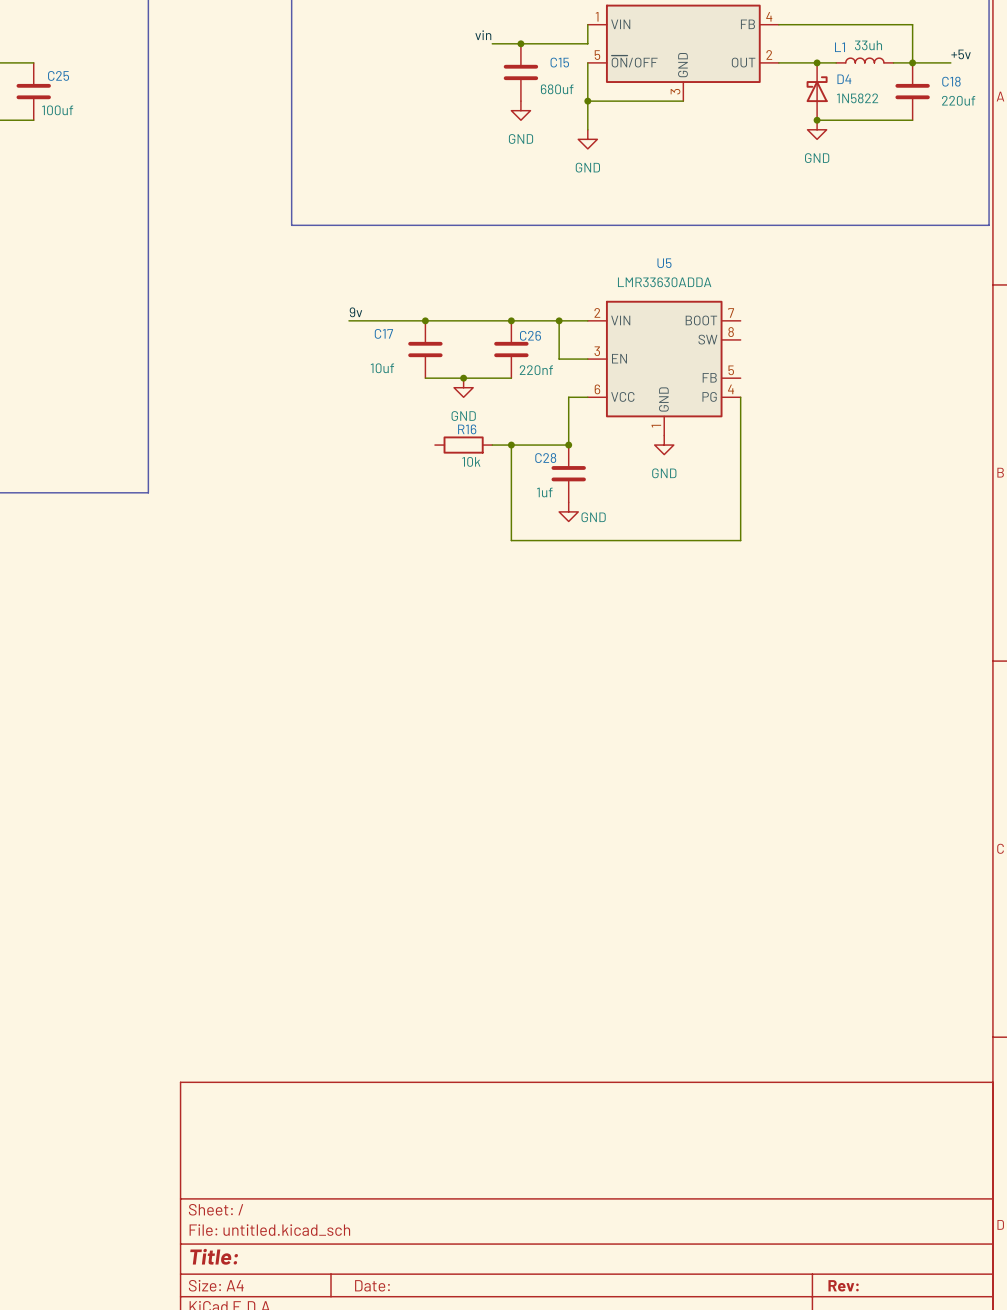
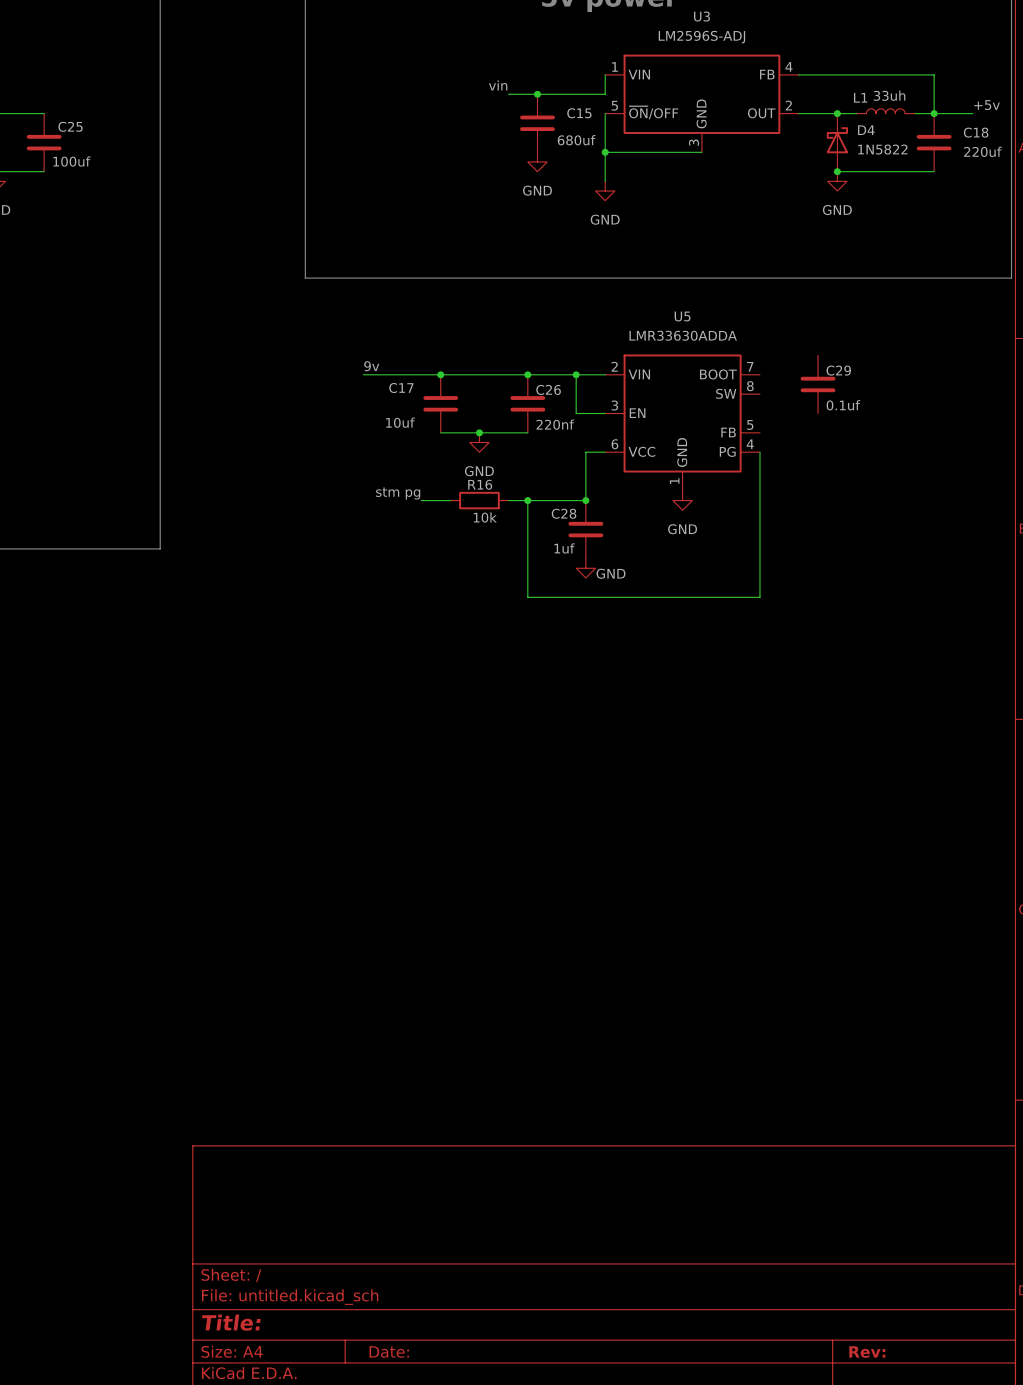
C29: none -> 0.1uf (818, 384)
label: none -> stm pg (398, 493)
wire: none -> (421, 500) (450, 500)

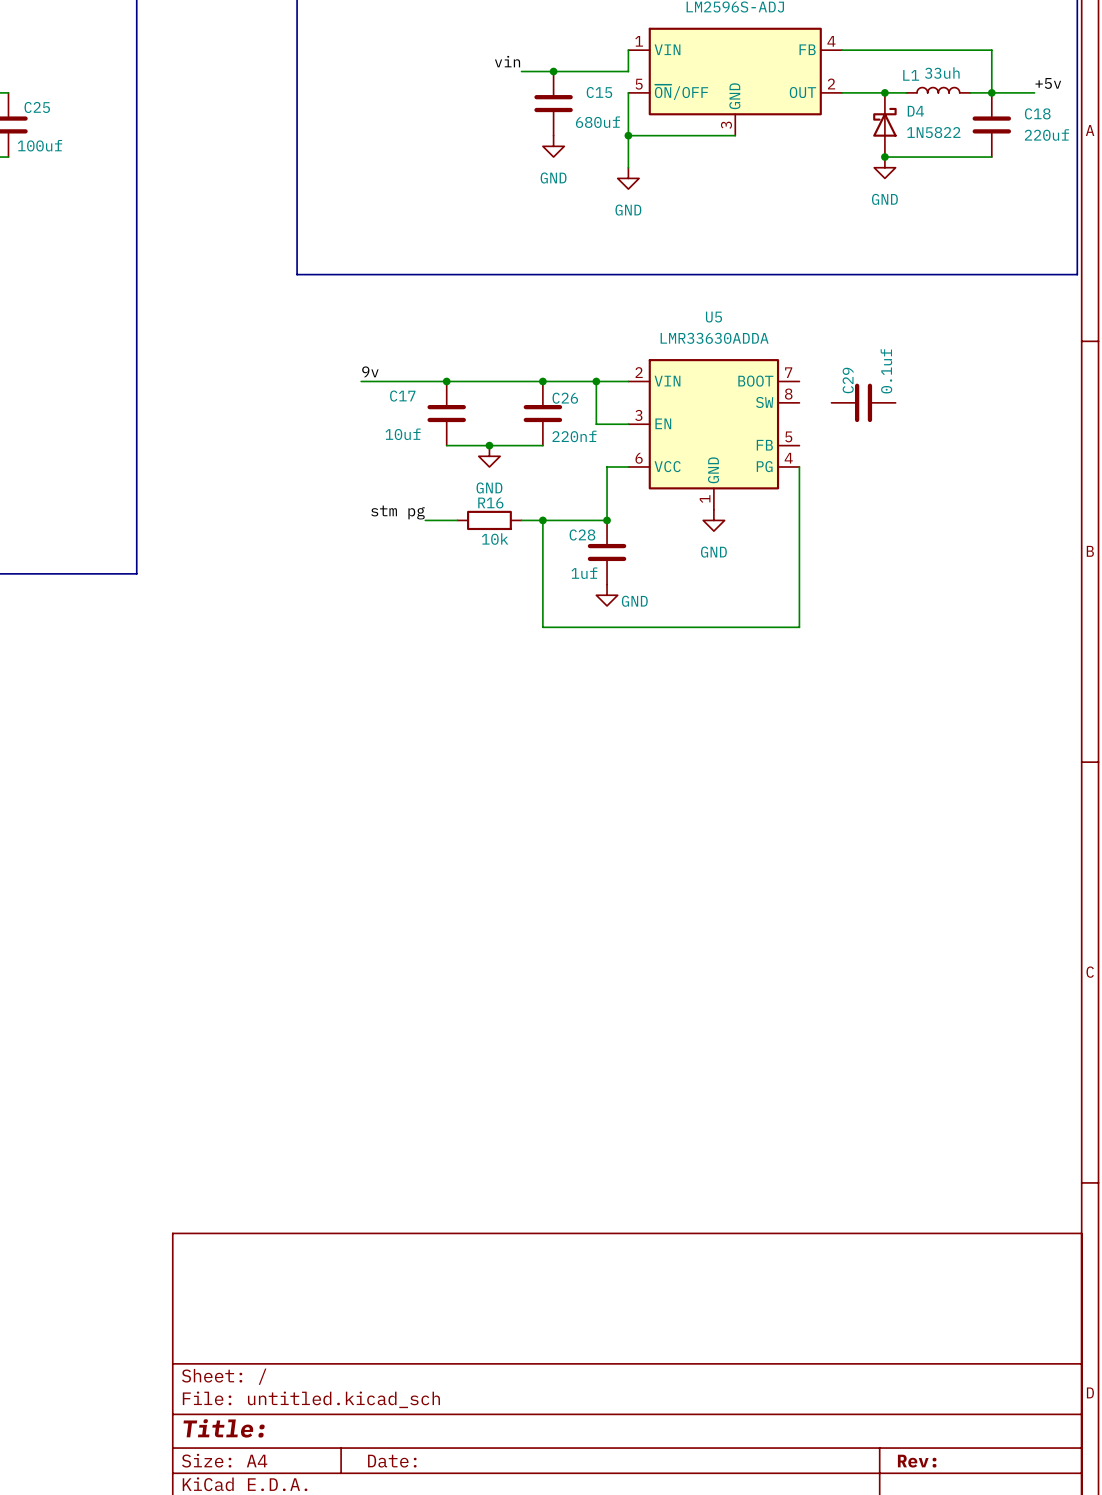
C29 name position: C29 (838, 370) -> C29 (848, 380)
C29 rotation: 0° (818, 384) -> 90° clockwise (863, 402)
C29 value position: 0.1uf (843, 405) -> 0.1uf (886, 371)

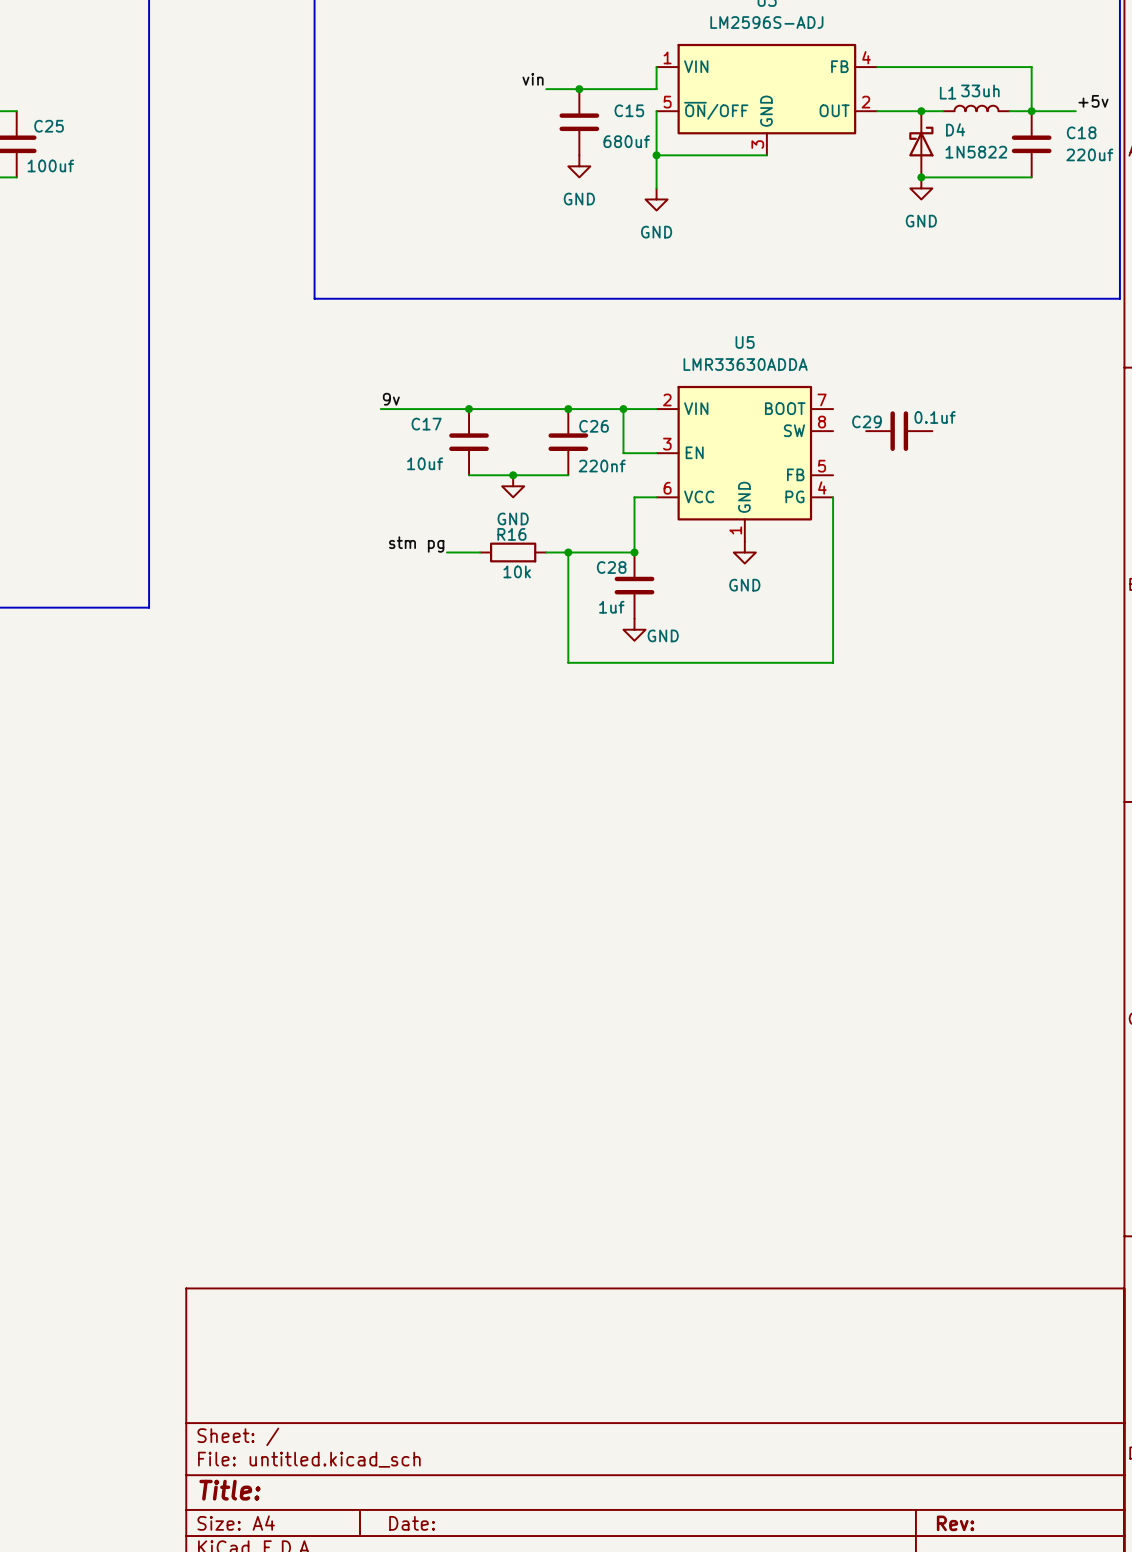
C29 value rotation: 0° (886, 371) -> 90° clockwise (935, 417)
C29 name rotation: 0° (848, 380) -> 90° clockwise (866, 421)

